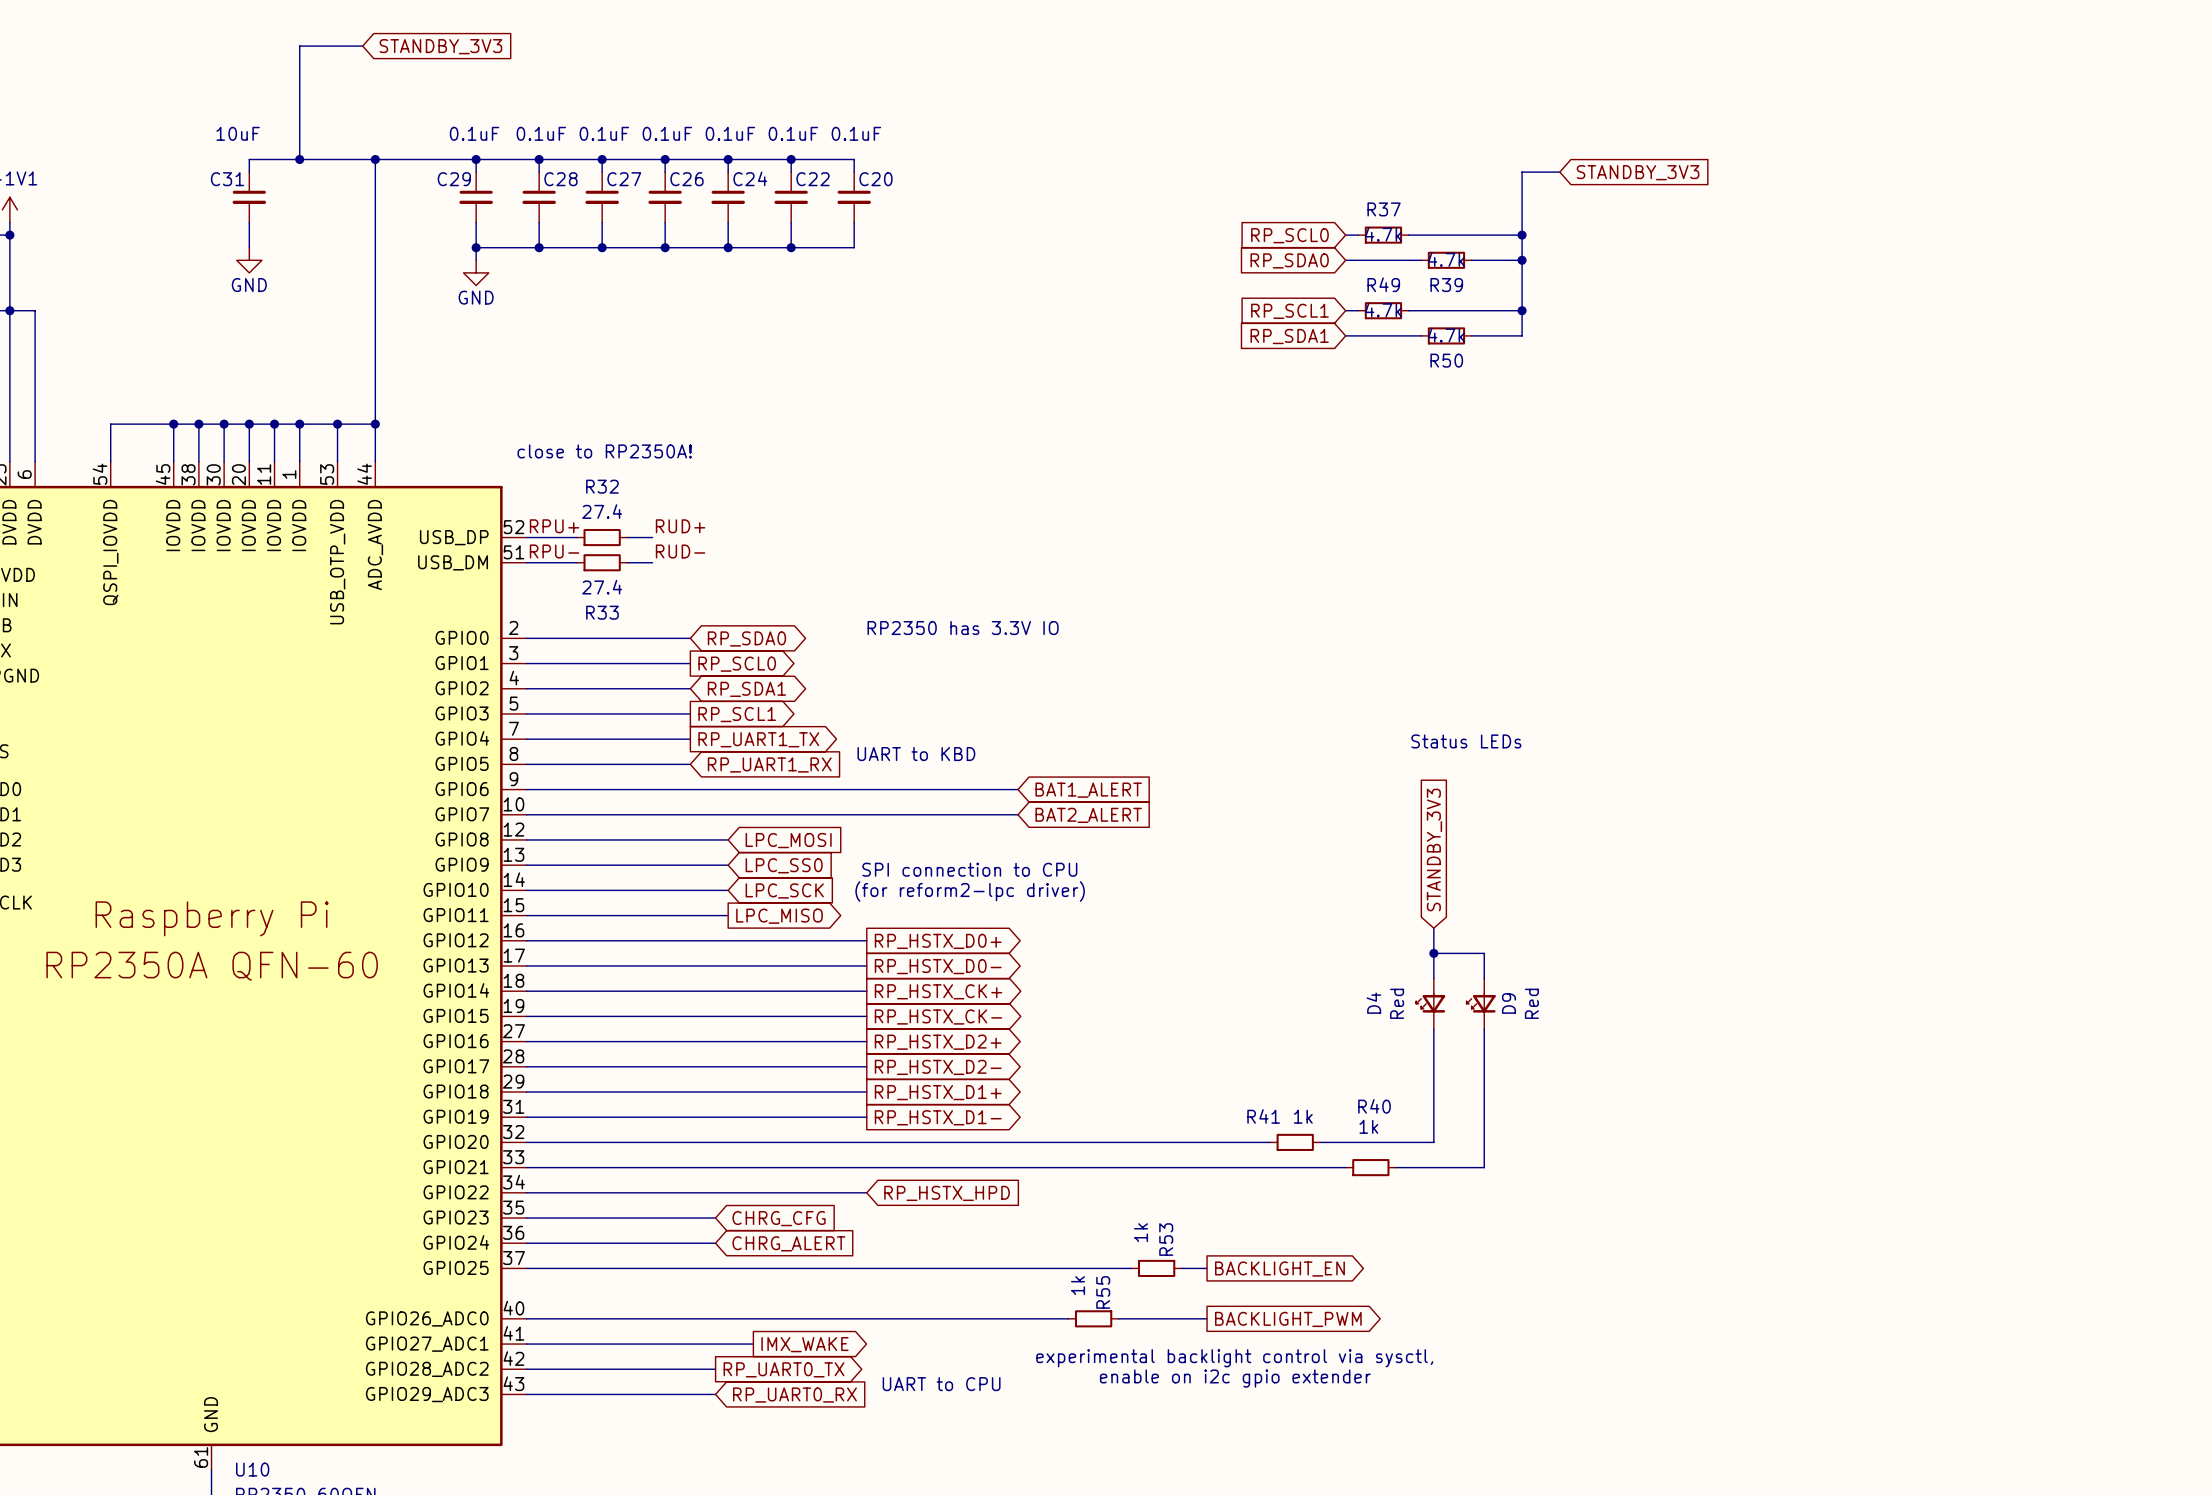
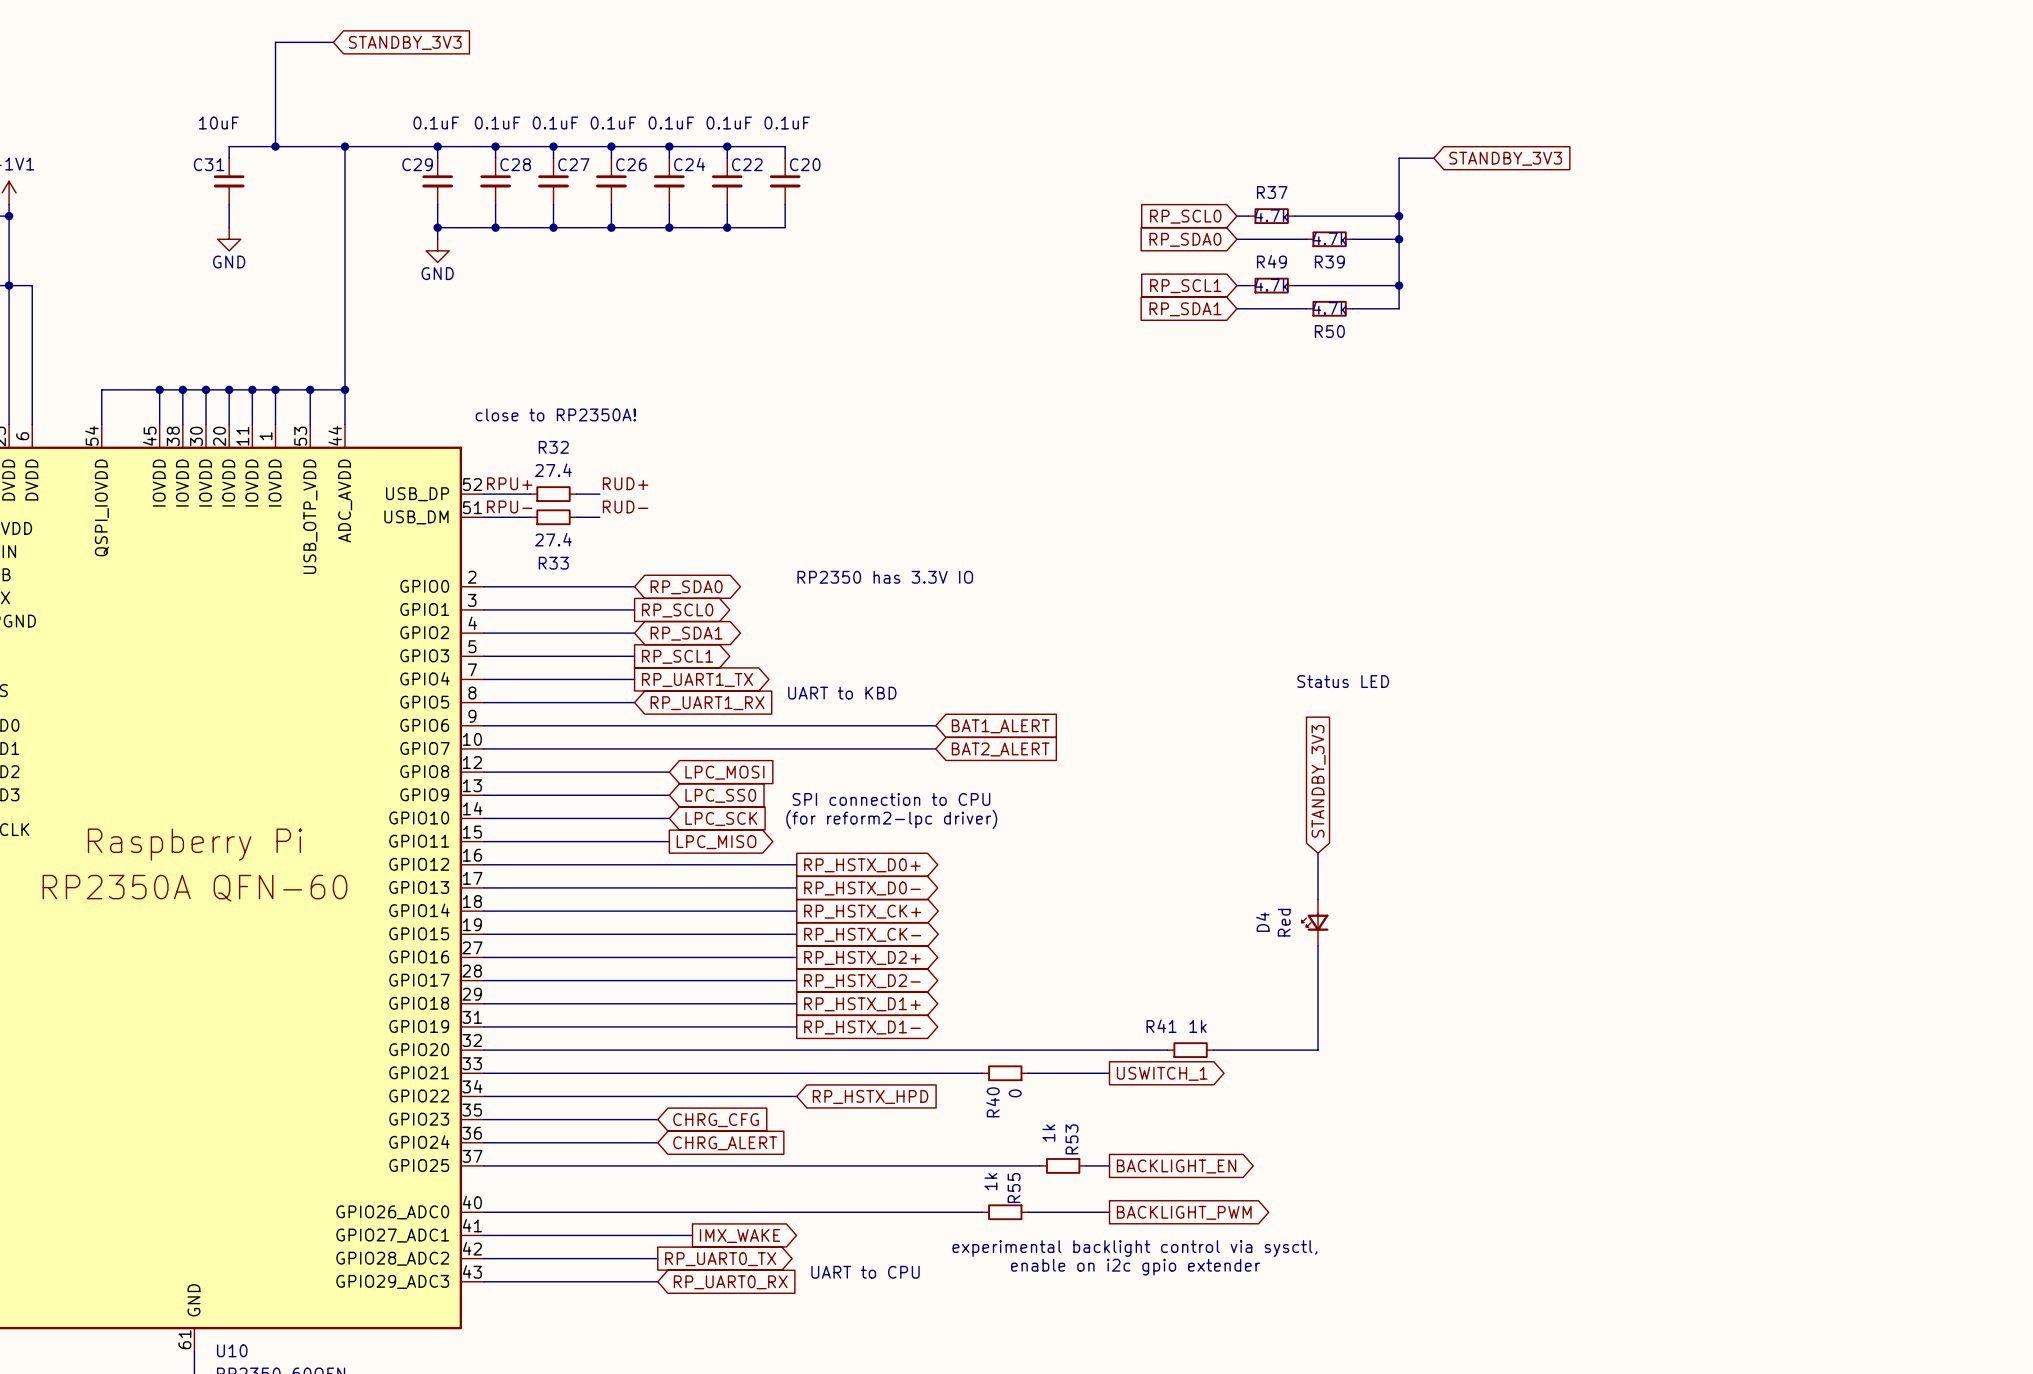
text: Status LEDs (1466, 741) -> Status LED (1343, 681)
wire: (1433, 953) (1484, 953) (1484, 978) -> none
junction: (1433, 953) -> none
D9: Red (1481, 1003) -> none
wire: (1484, 1029) (1484, 1167) (1396, 1167) -> none
R40 name rotation: 0° (1374, 1106) -> 90° counterclockwise (992, 1102)
R40 name position: R40 (1374, 1106) -> R40 (992, 1102)
R40 value: 1k (1368, 1126) -> 0 (1015, 1093)
wire: (1068, 1167) (1118, 1167) -> none
wire: (1207, 1167) (1345, 1167) -> none
R40 position: (1370, 1167) -> (1005, 1073)
global label: none -> USWITCH_1 (1162, 1073)

